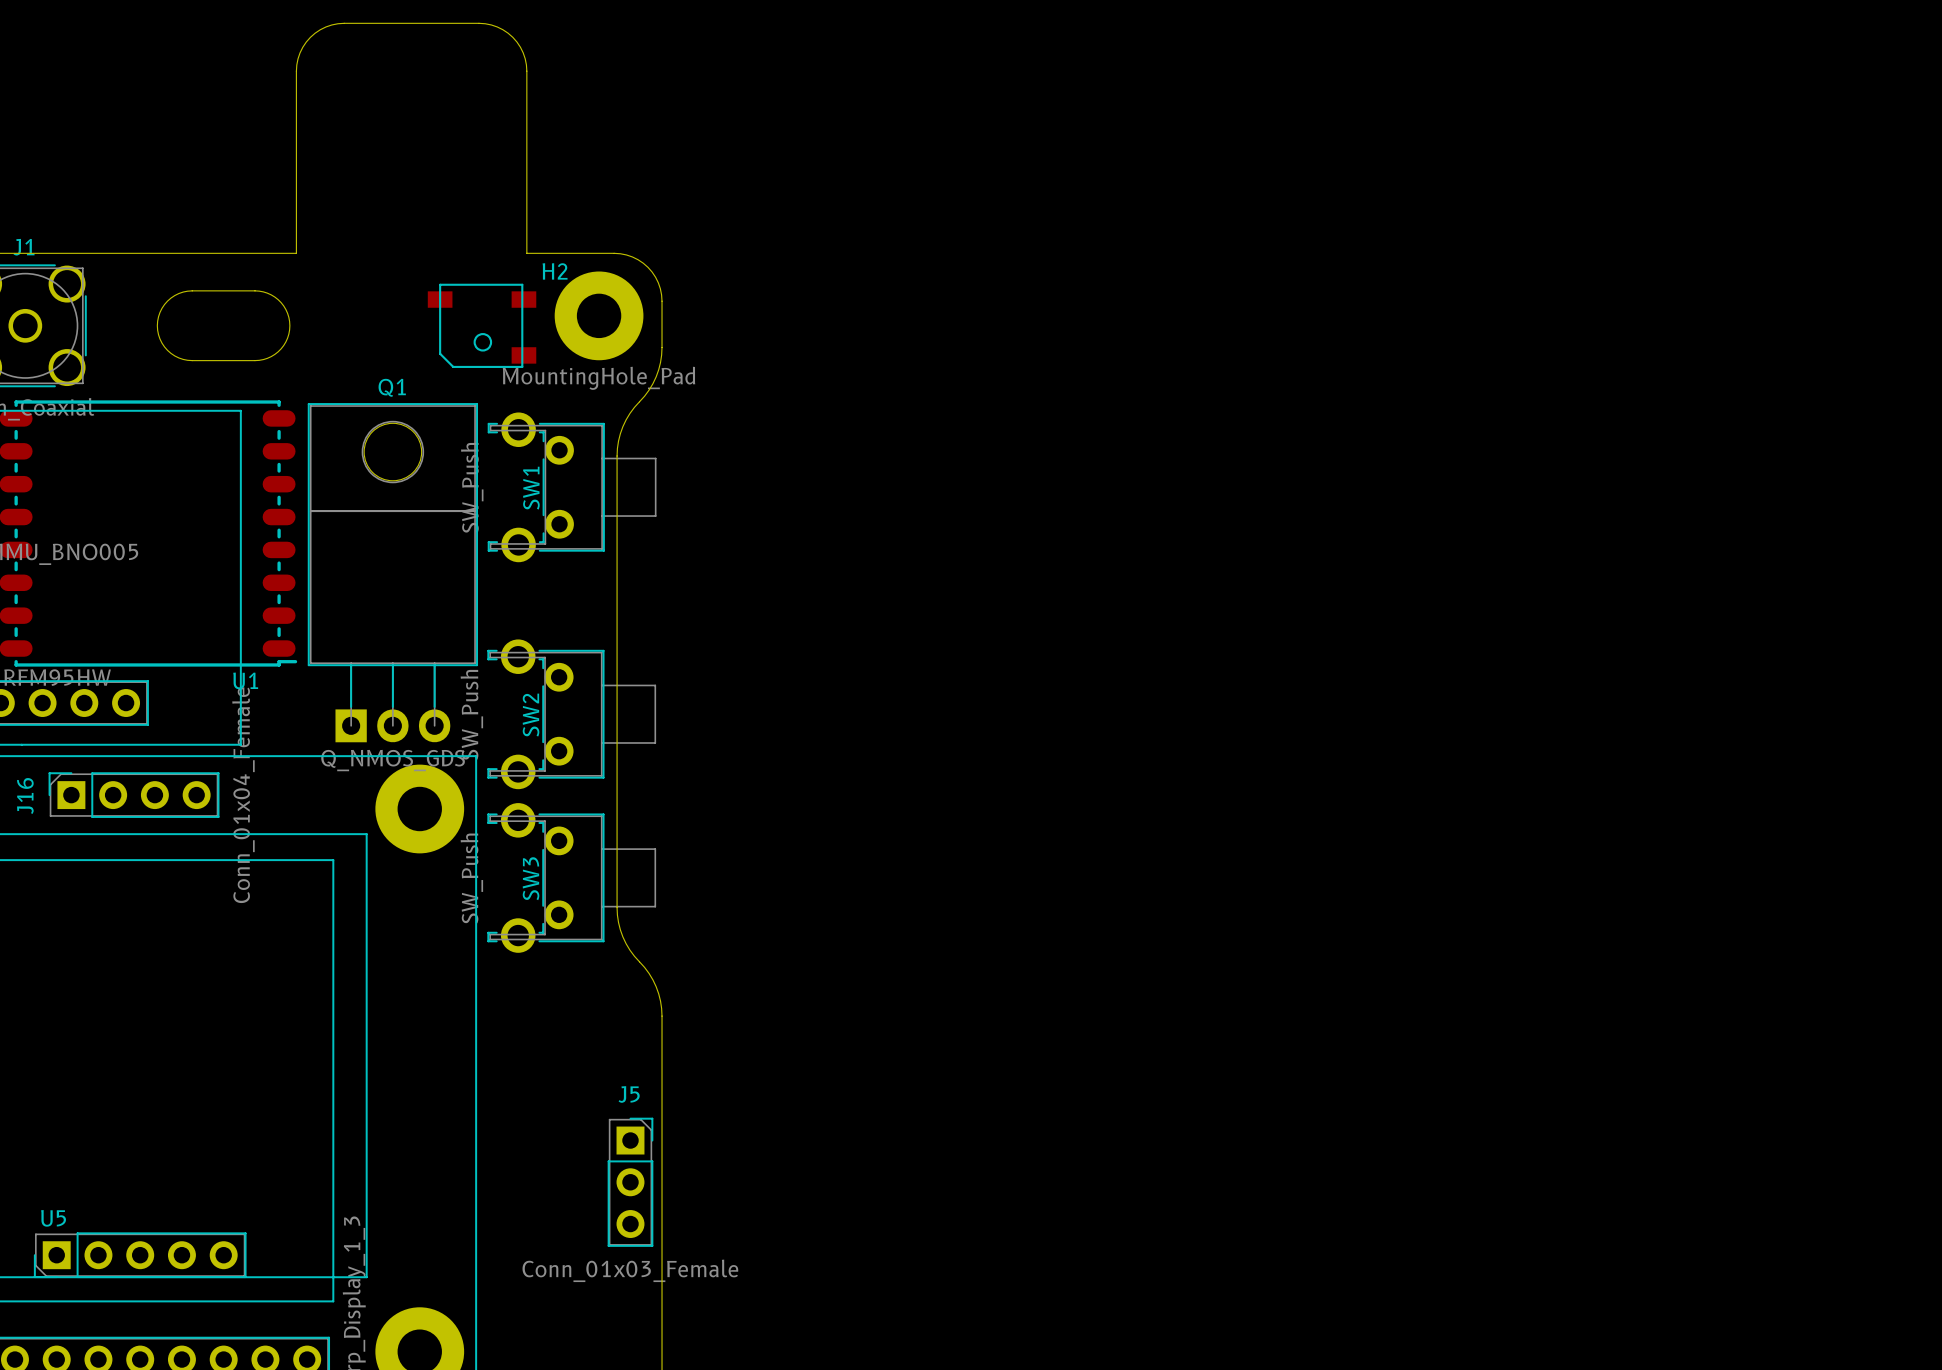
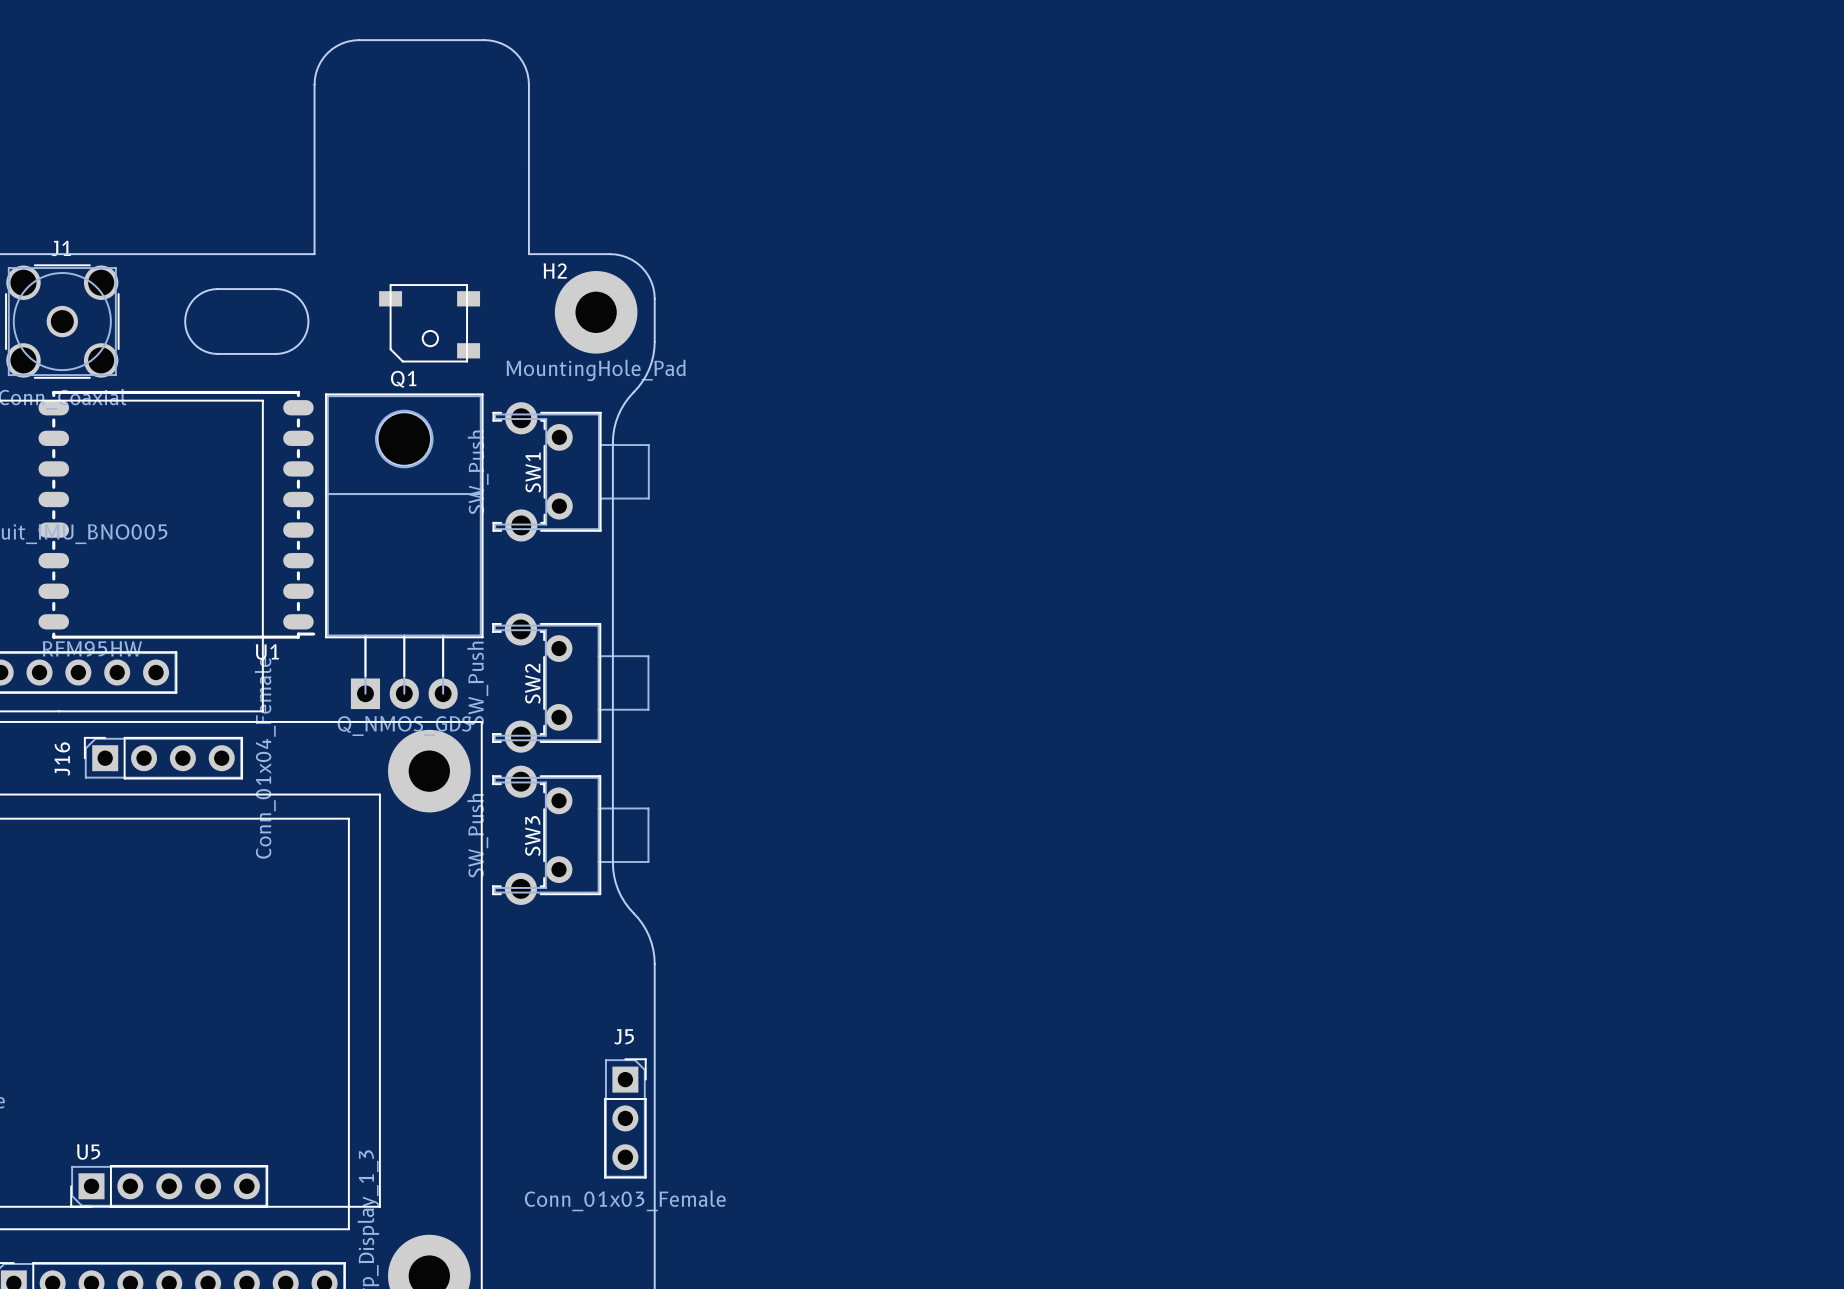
part position: (482, 325) -> (429, 323)

